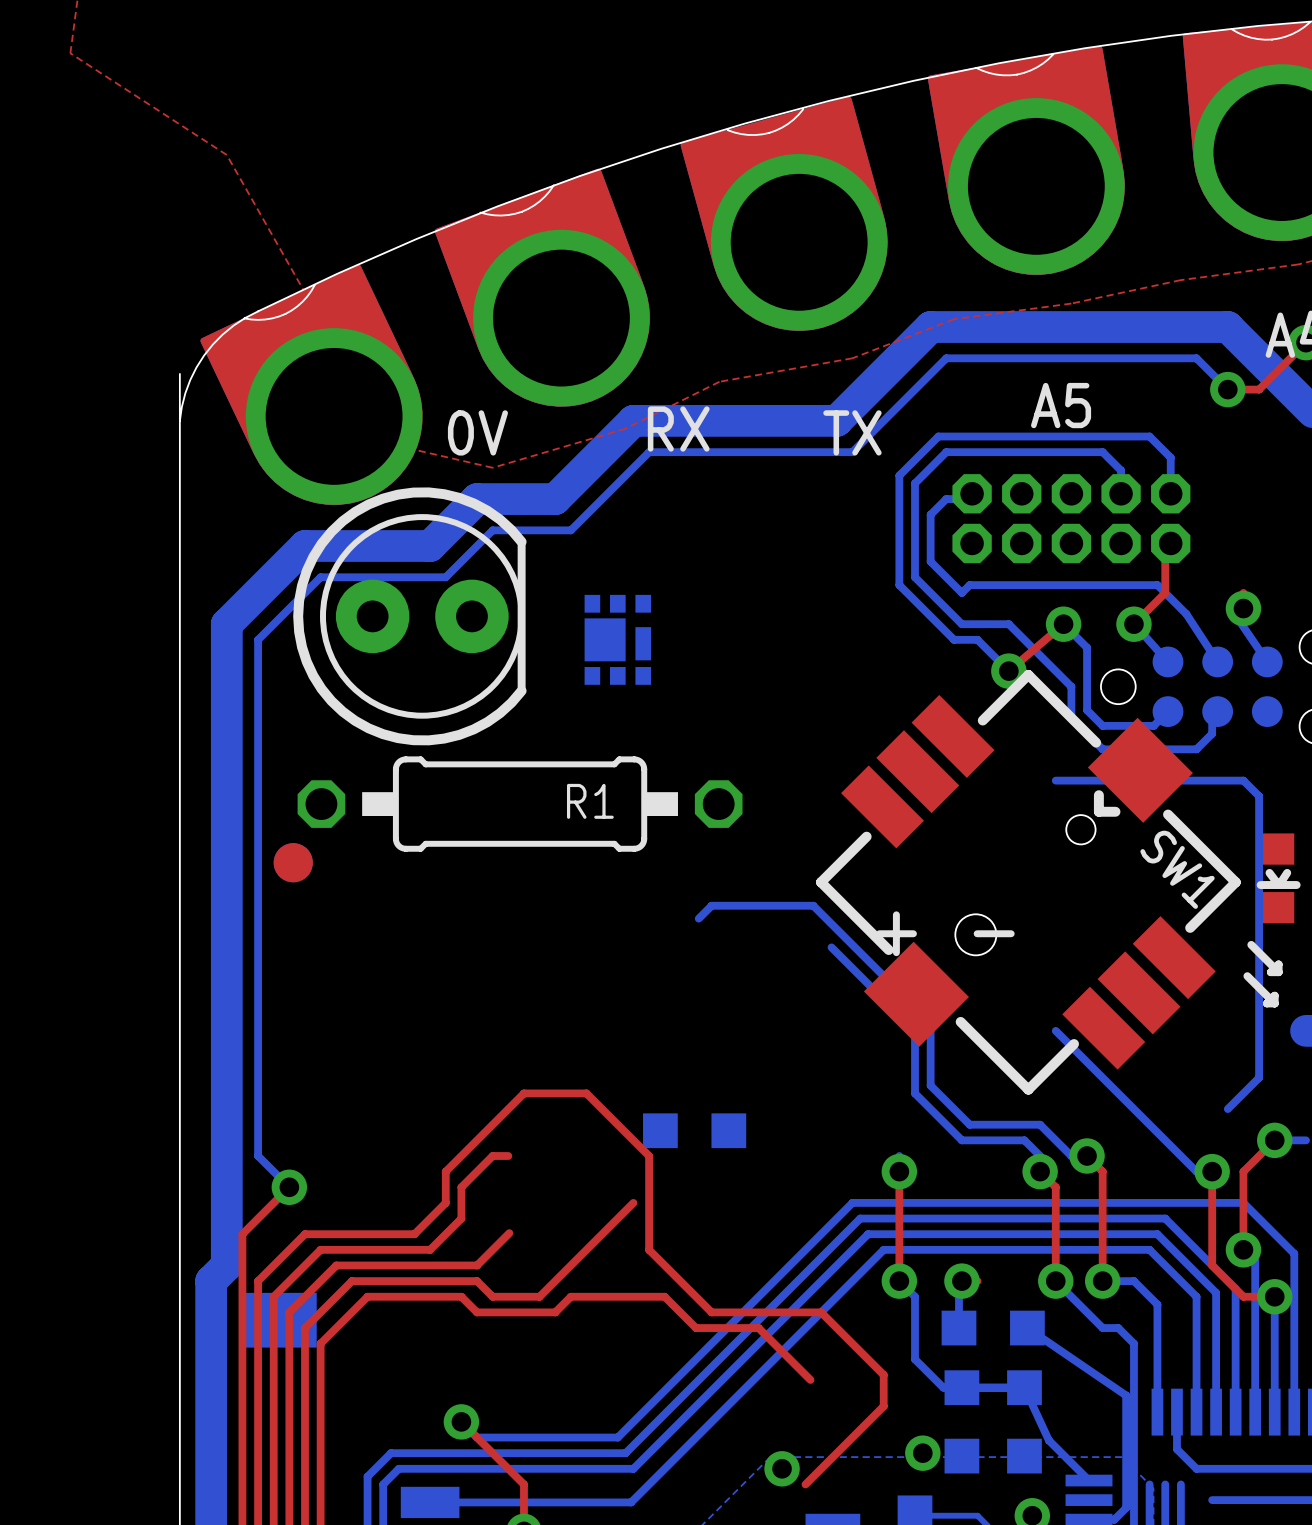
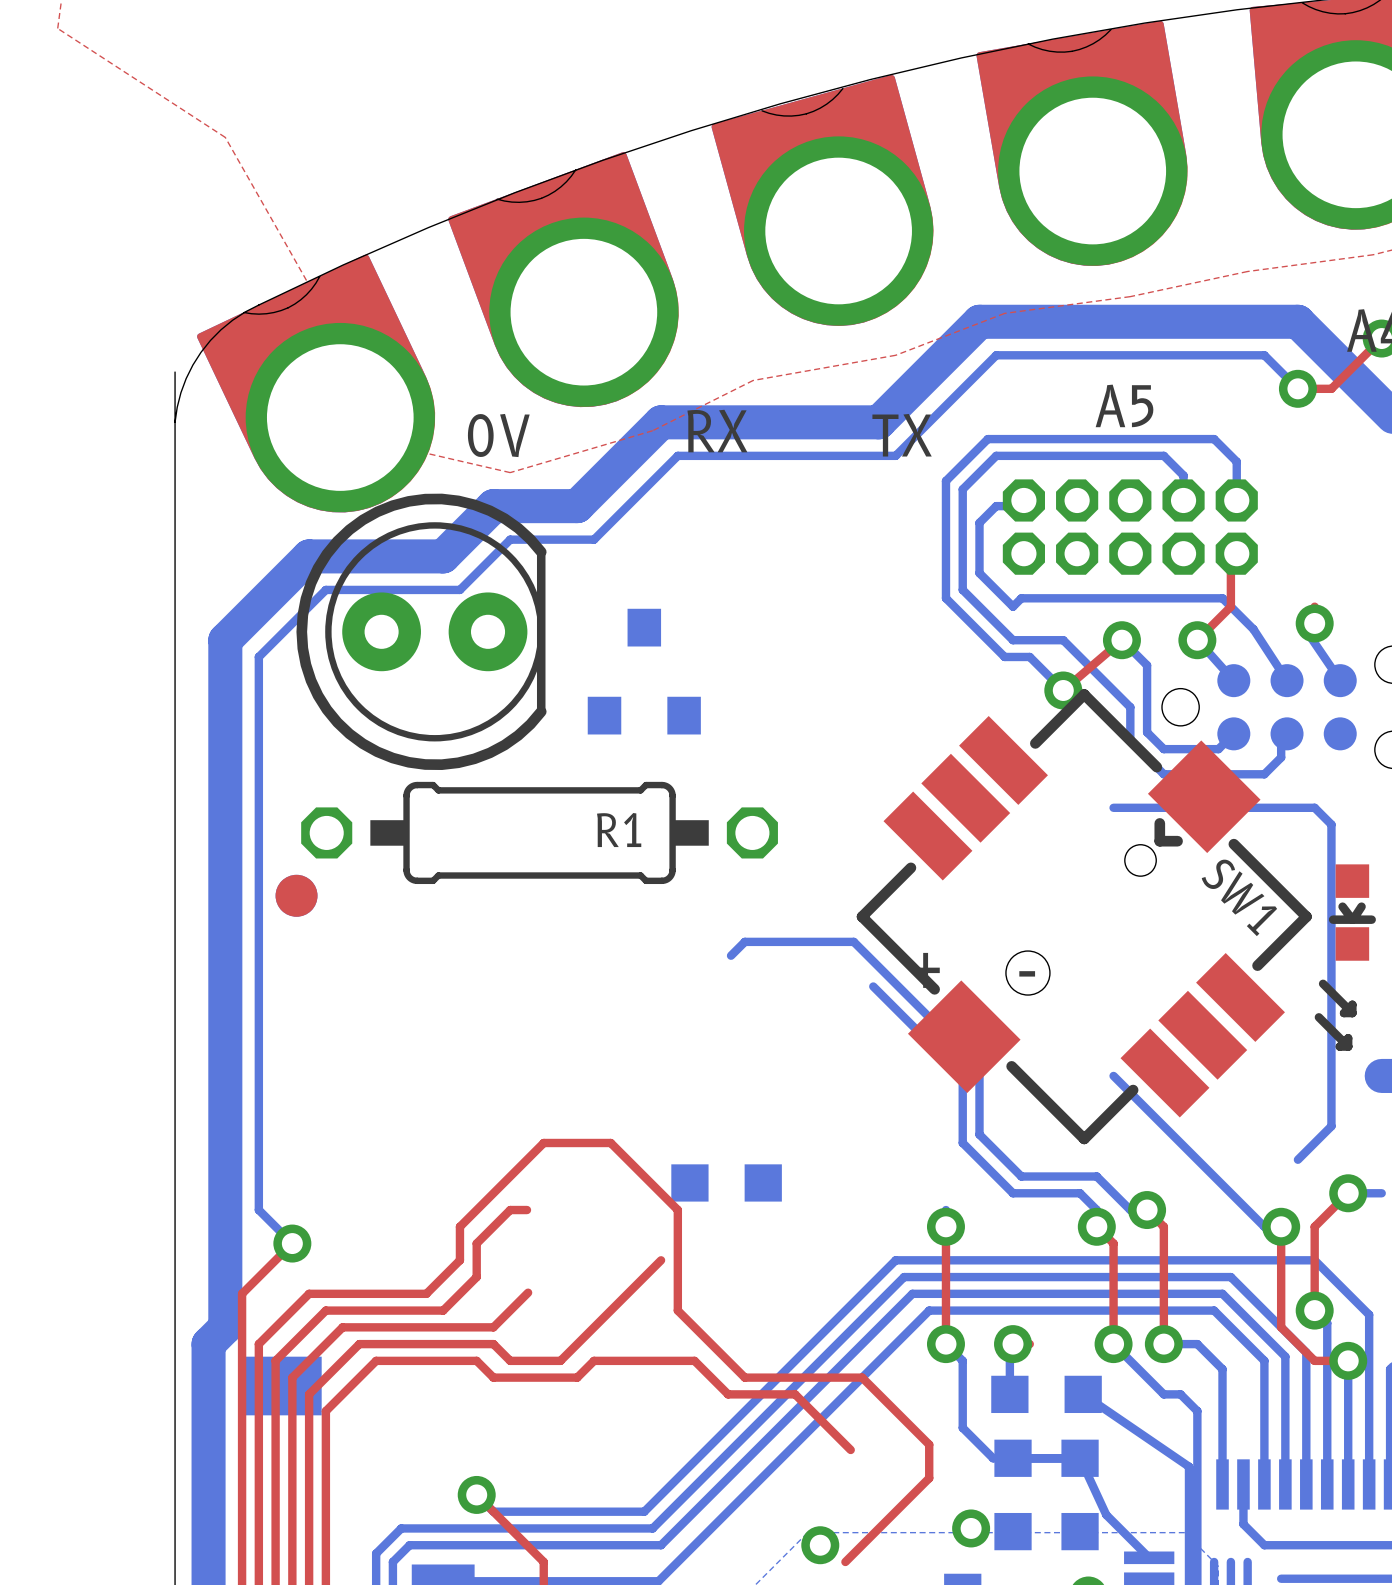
part footprint: [584, 594, 652, 685] -> [587, 608, 701, 735]

